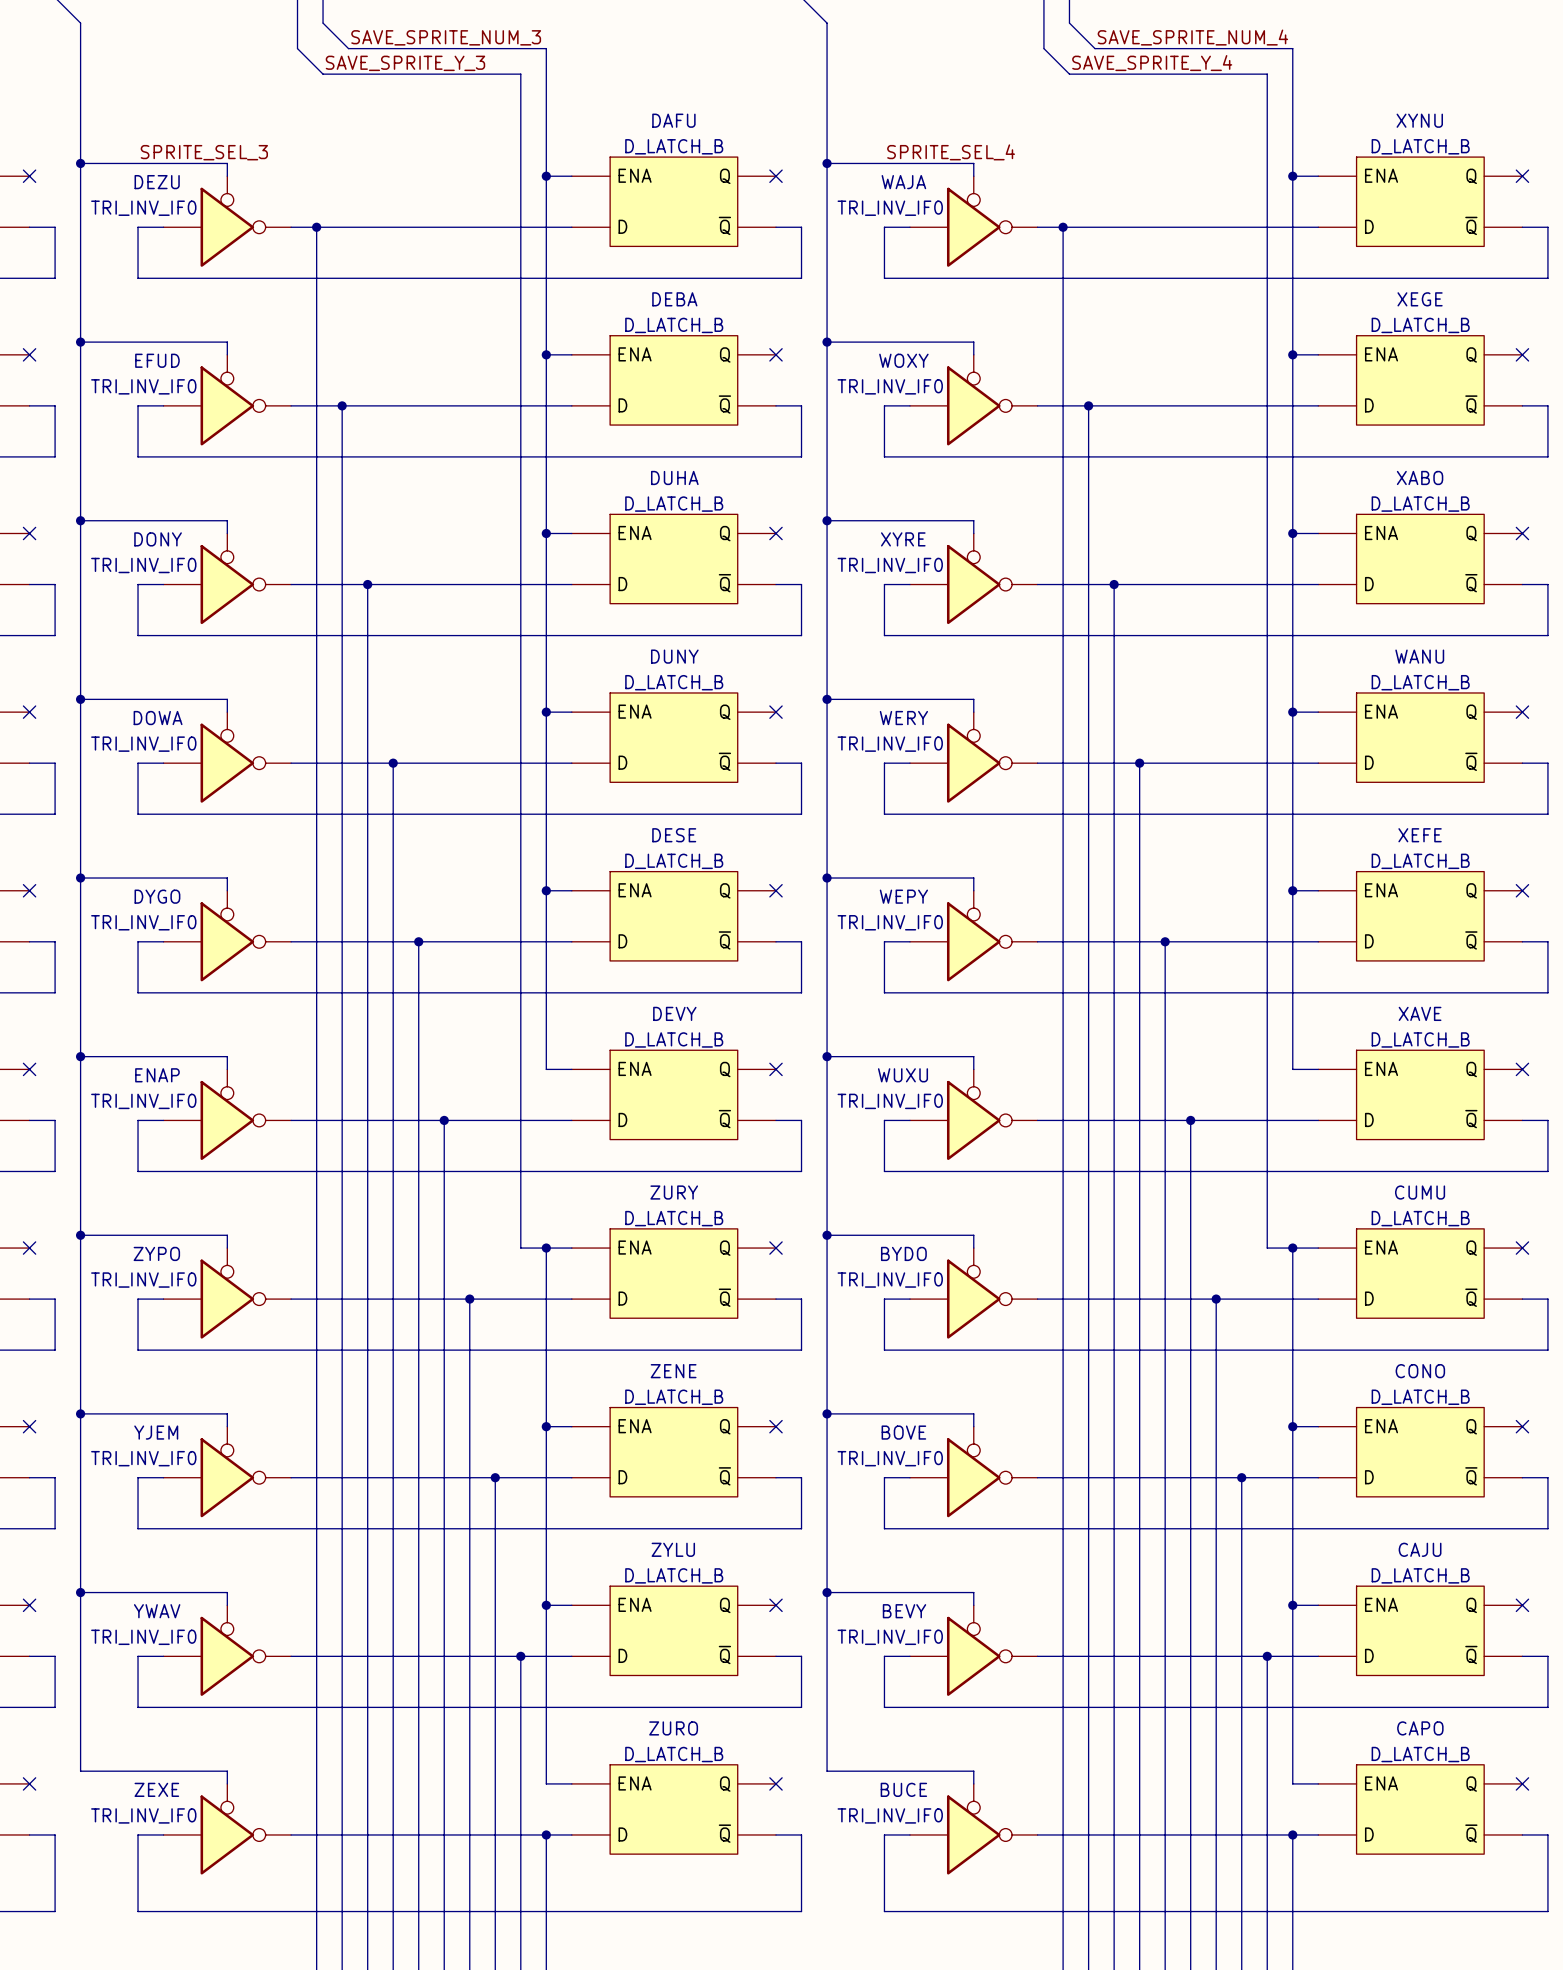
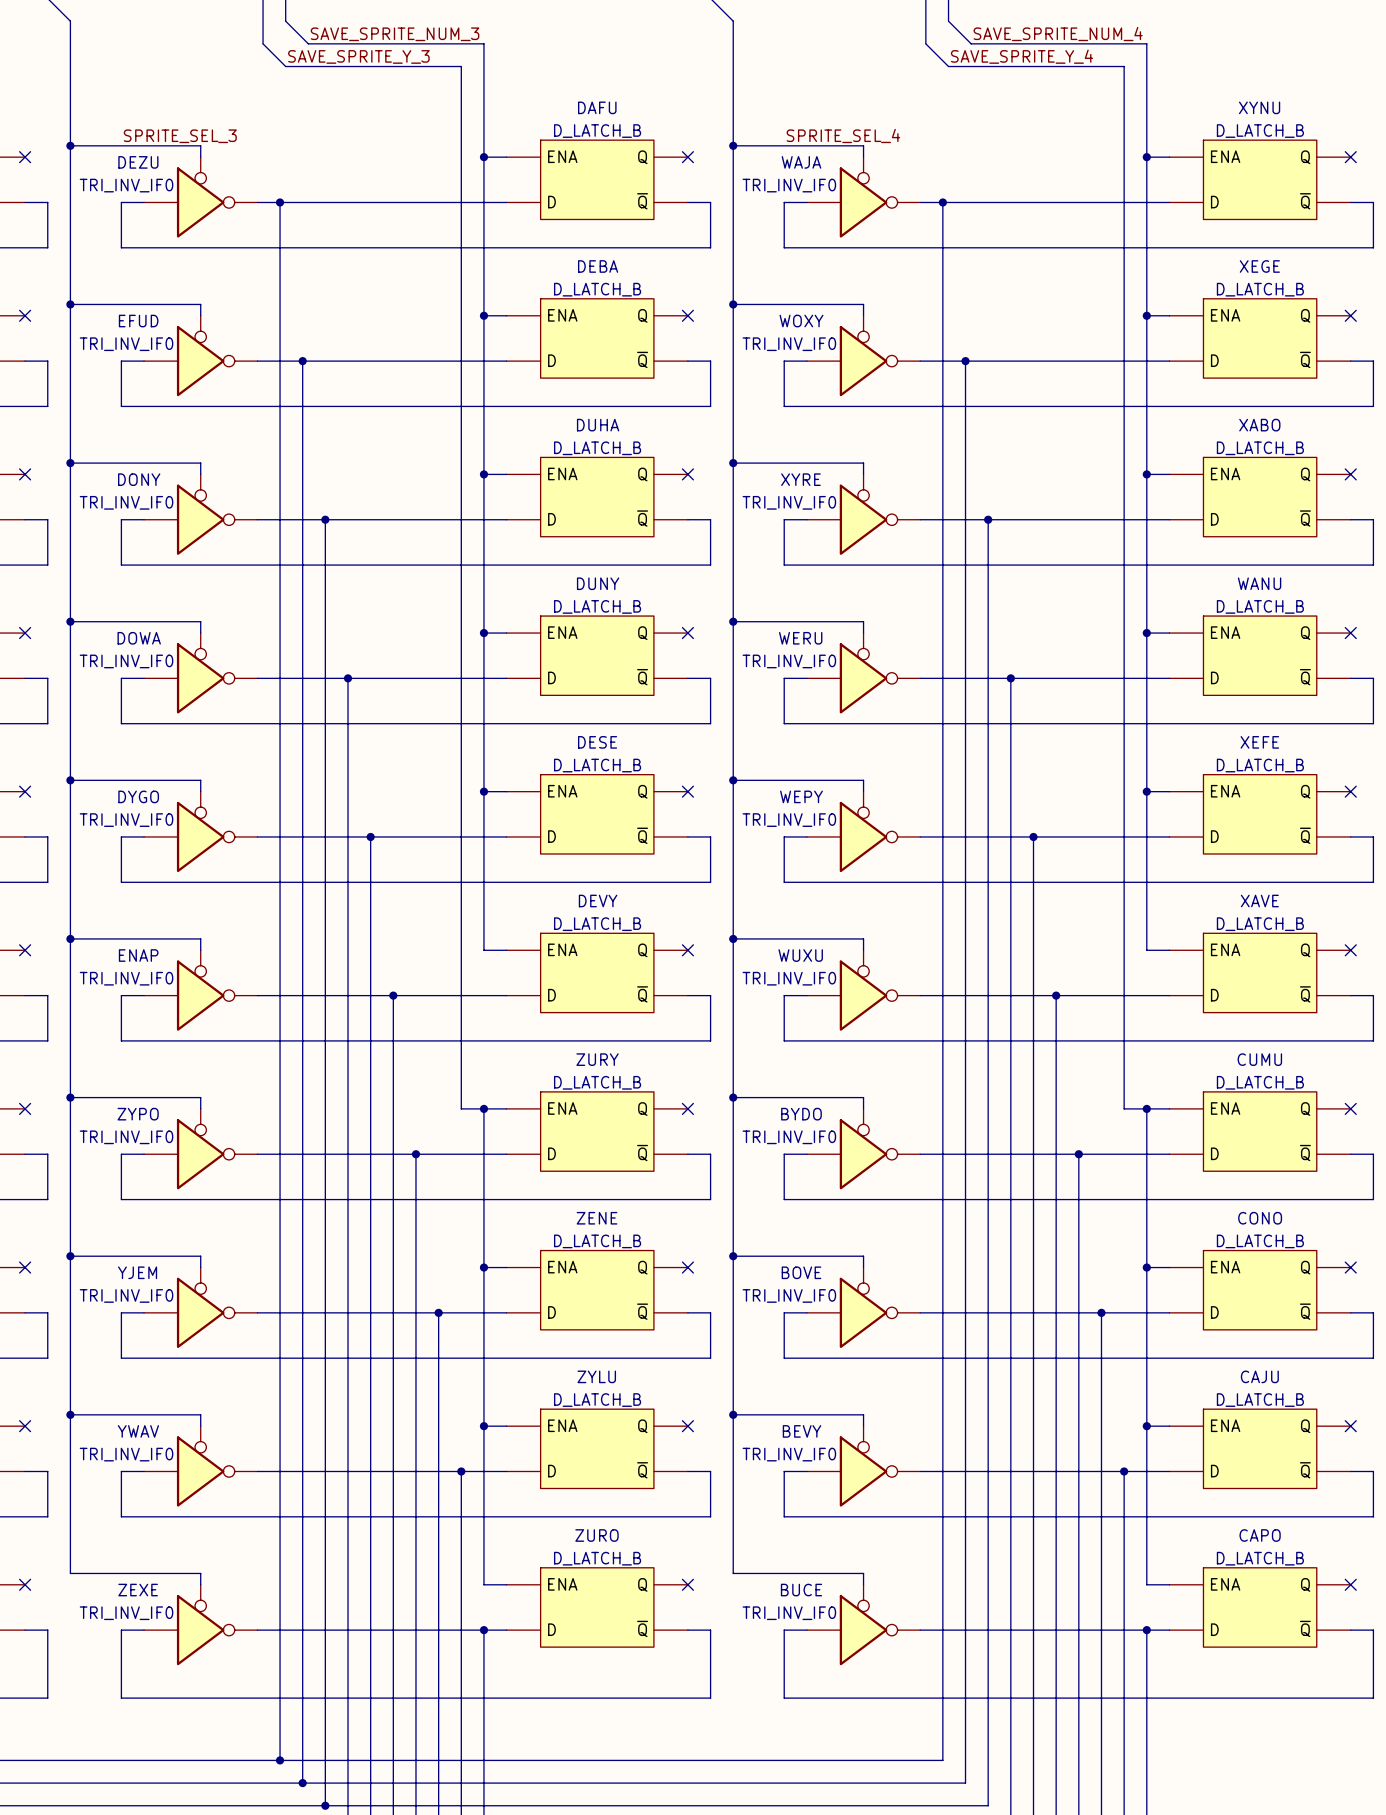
WERY name: WERY (903, 718) -> WERU (800, 638)

